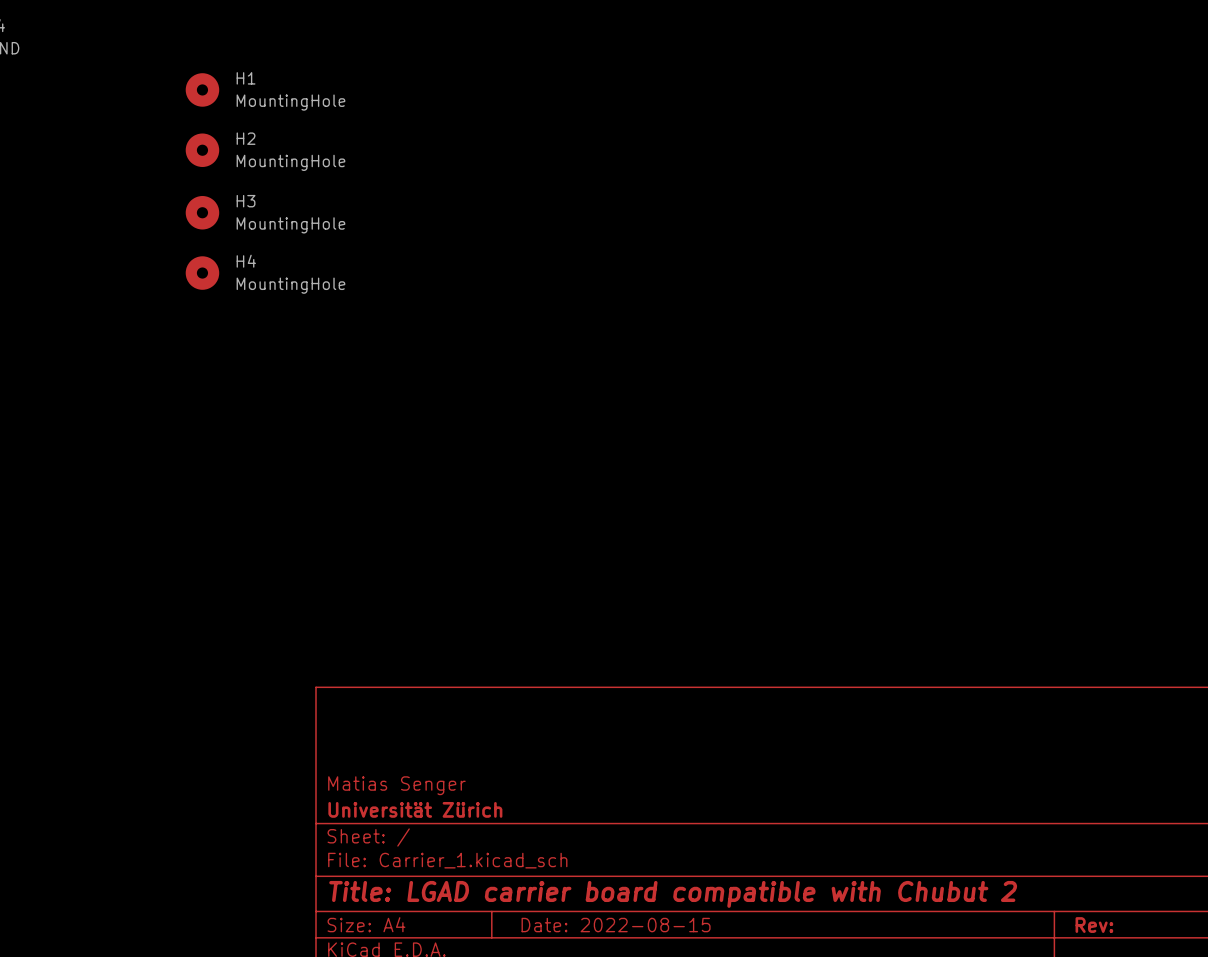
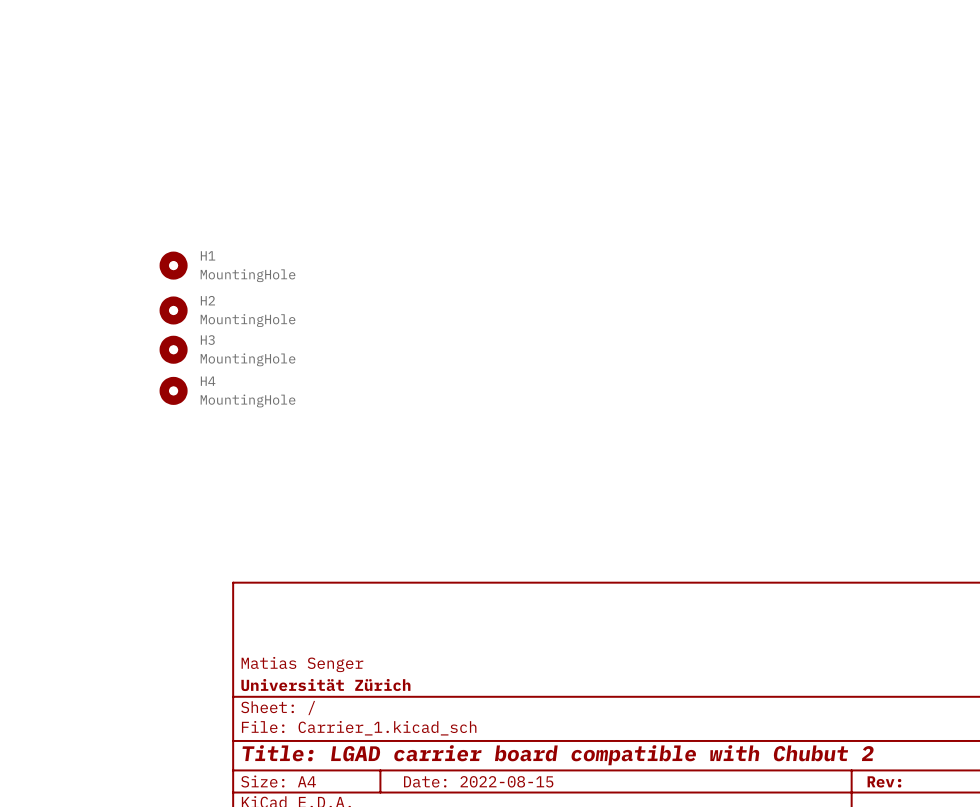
H1 position: (202, 89) -> (173, 265)
H2 position: (202, 150) -> (173, 310)
H3 position: (202, 212) -> (173, 349)
H4 position: (202, 273) -> (173, 390)

